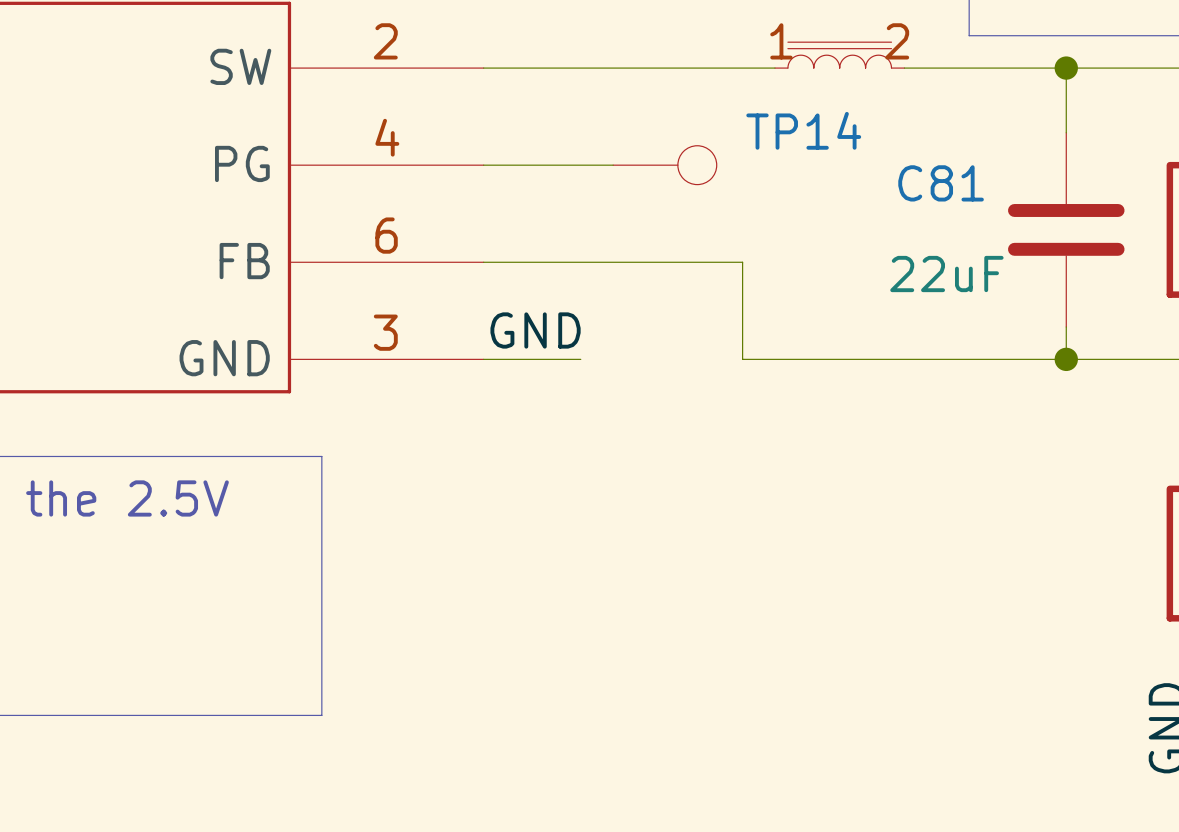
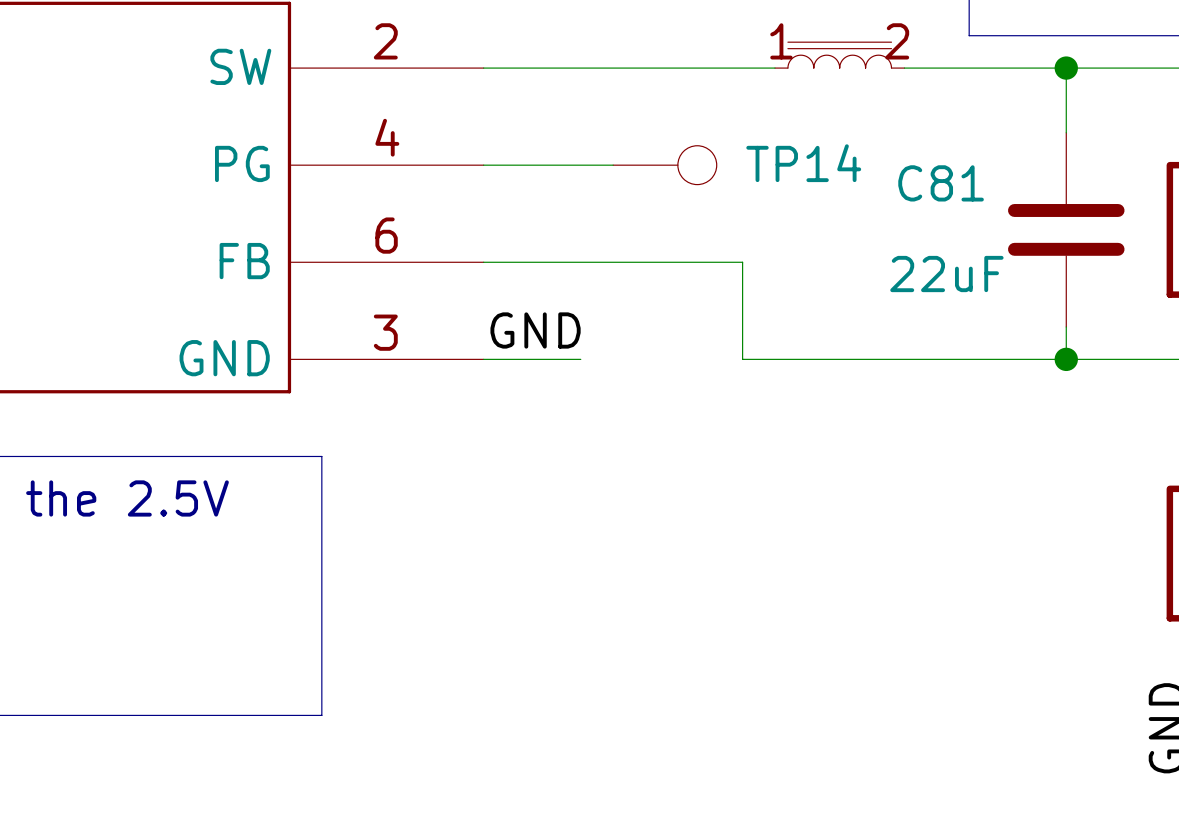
TP14 name position: TP14 (803, 130) -> TP14 (803, 163)

